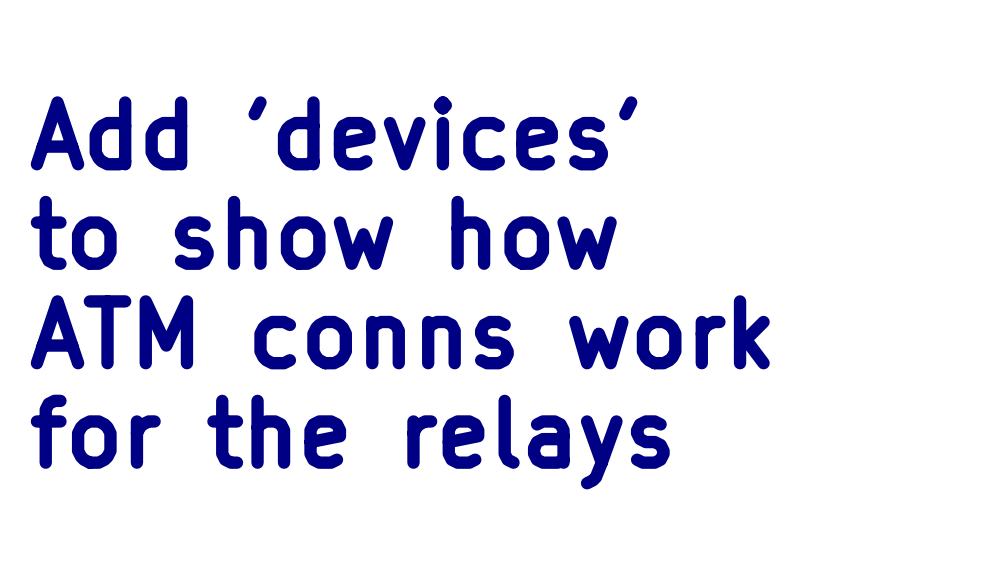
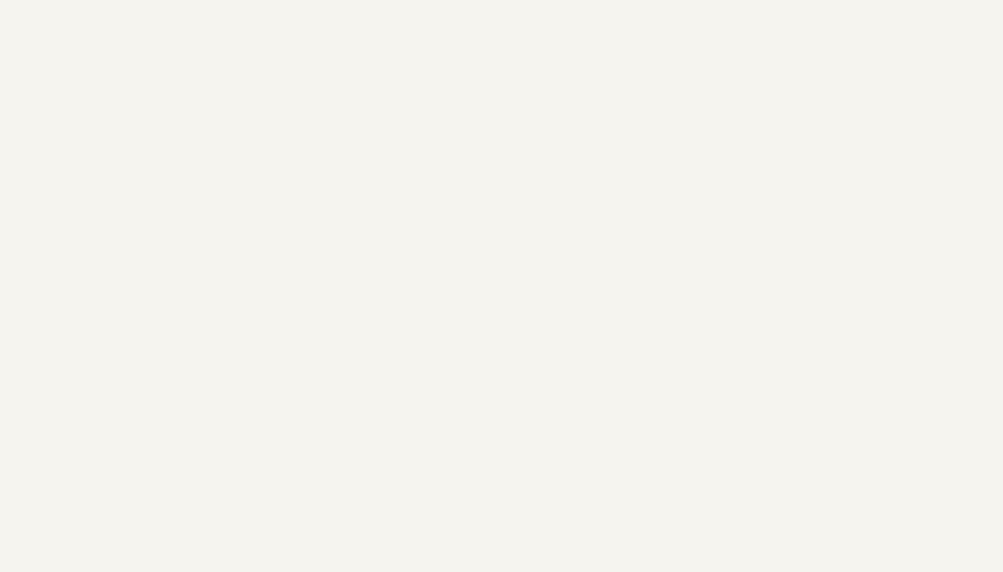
text: Add 'devices' (334, 133) -> none
text: to show how (323, 232) -> none
text: ATM conns work (400, 332) -> none
text: for the relays (350, 442) -> none

